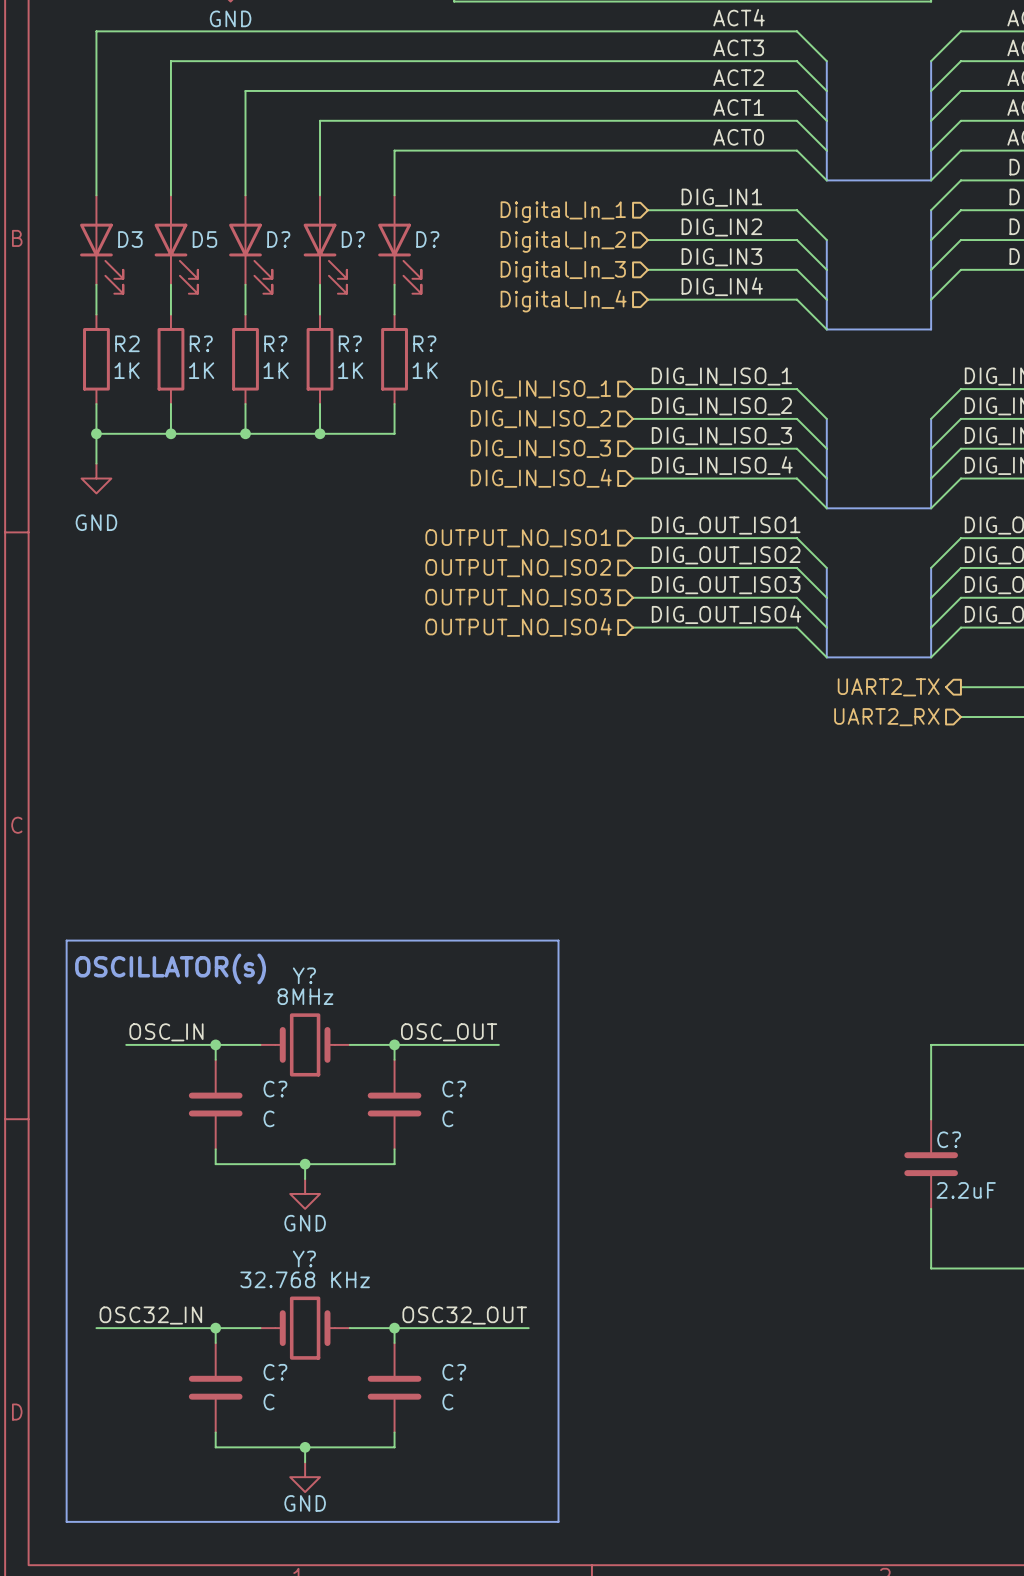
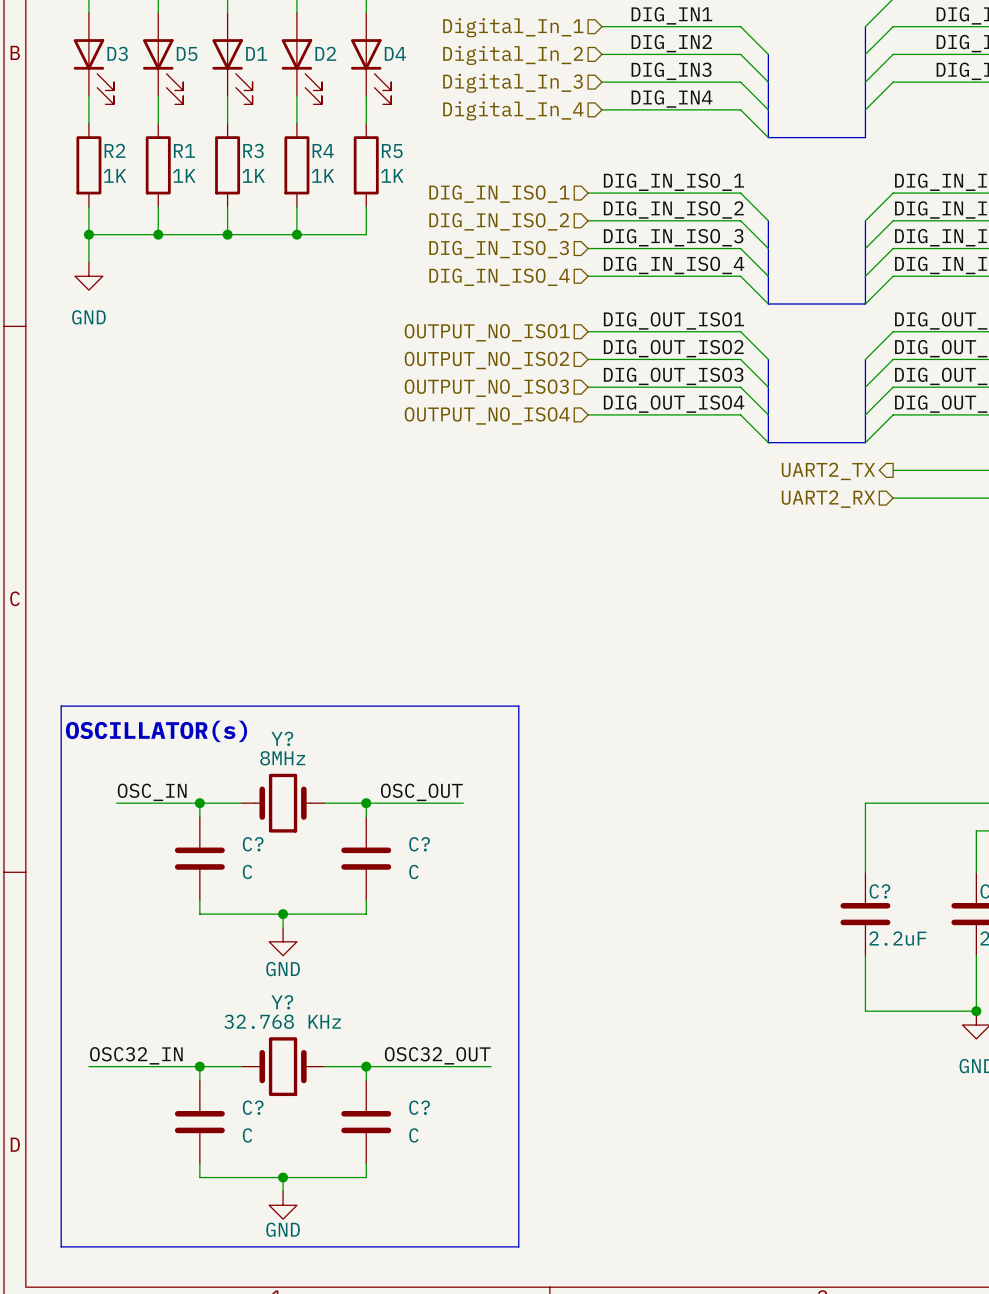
D? name: D? (278, 239) -> D1 (256, 53)
D? name: D? (353, 239) -> D2 (325, 53)
D? name: D? (427, 239) -> D4 (395, 53)
R? name: R? (201, 343) -> R1 (184, 150)
R? name: R? (275, 343) -> R3 (253, 150)
R? name: R? (350, 343) -> R4 (323, 150)
R? name: R? (424, 343) -> R5 (392, 151)

